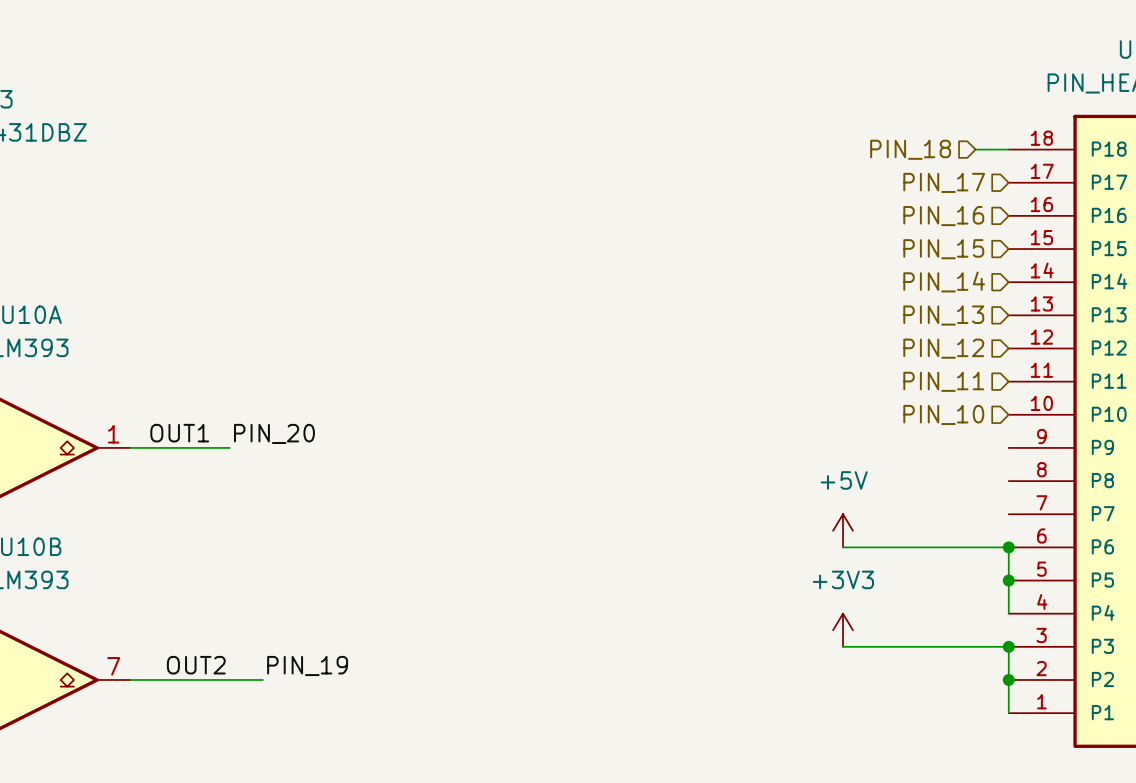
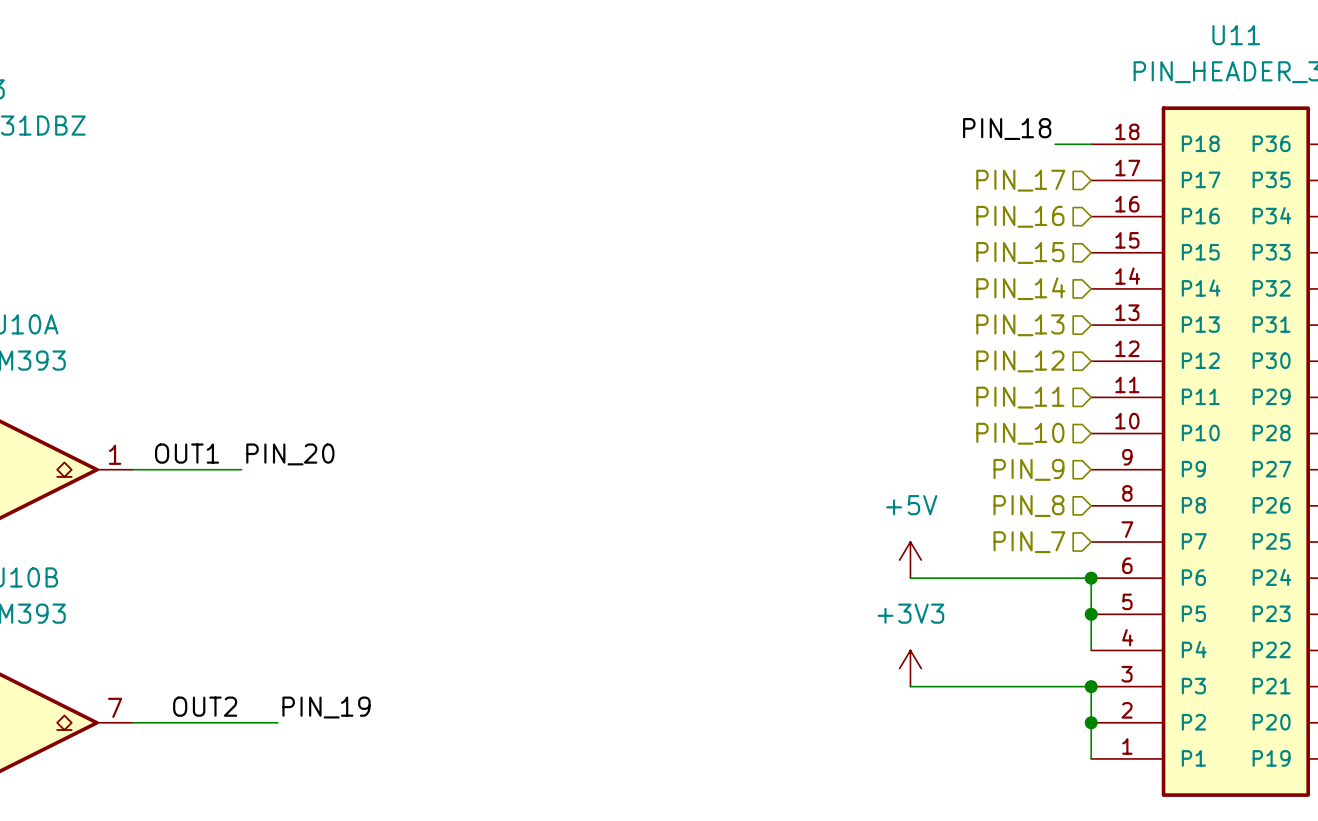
label: none -> PIN_18 (1007, 129)
hierarchical label: PIN_18 (910, 149) -> none
hierarchical label: none -> PIN_9 (1028, 469)
hierarchical label: none -> PIN_8 (1028, 506)
hierarchical label: none -> PIN_7 (1029, 542)

